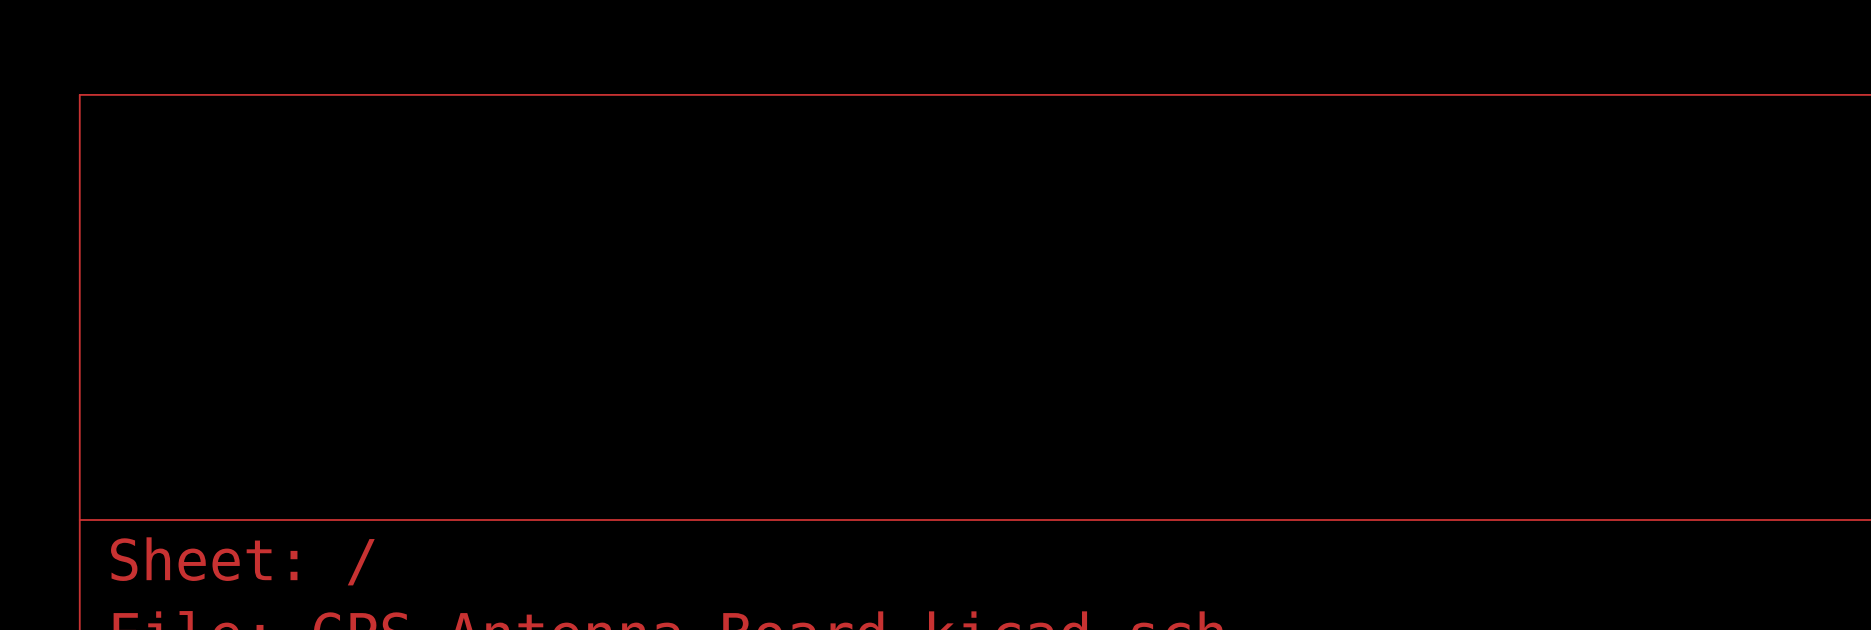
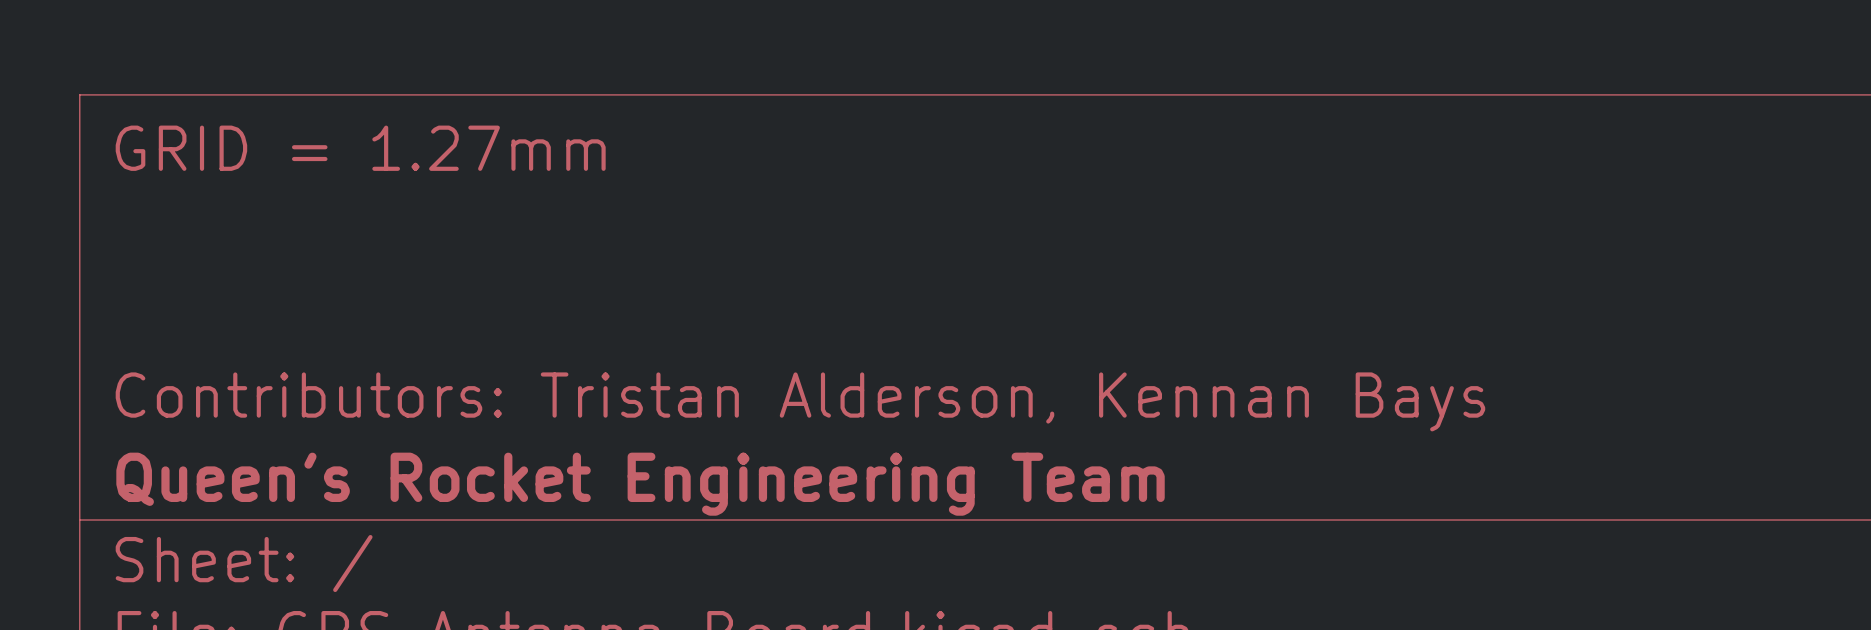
title block: none -> GRID = 1.27mm (360, 148)
title block: none -> Contributors: Tristan Alderson, Kennan Bays (800, 401)
title block: none -> Queen's Rocket Engineering Team (640, 484)

